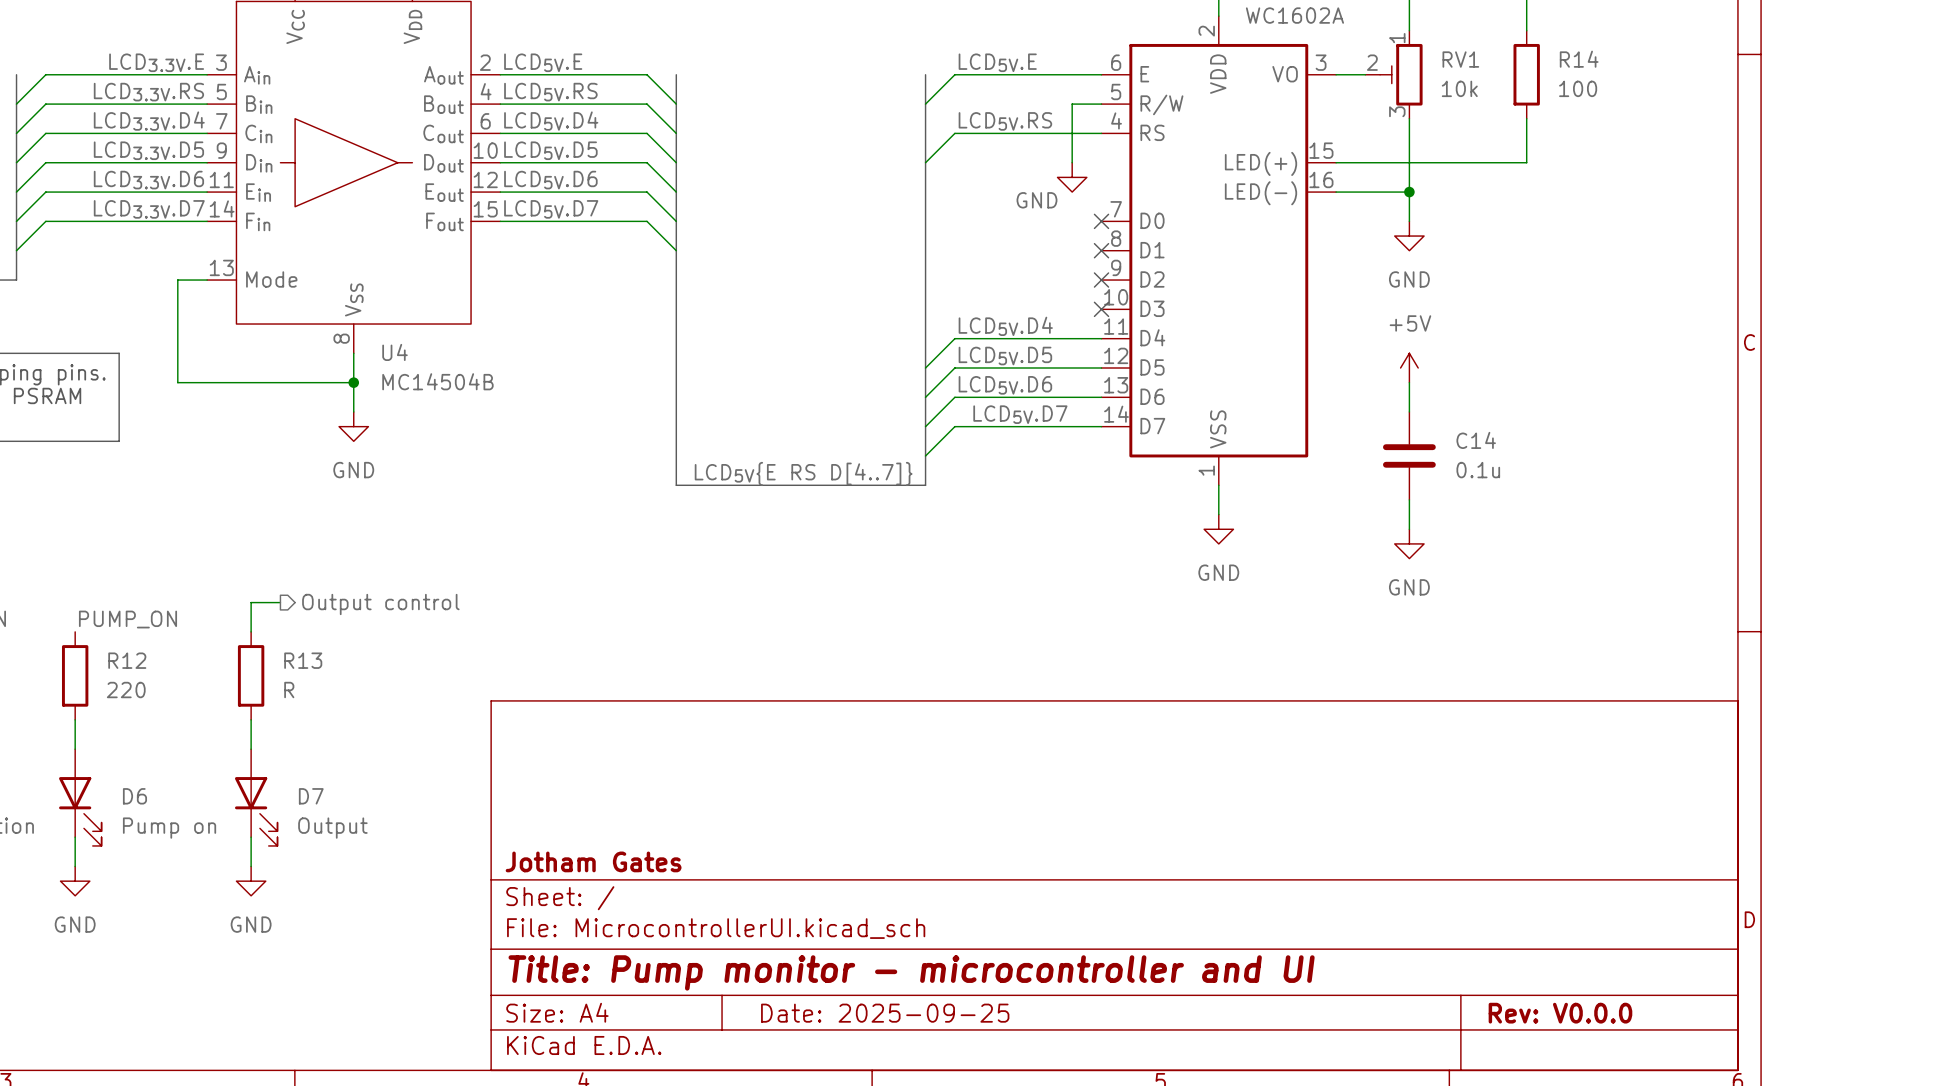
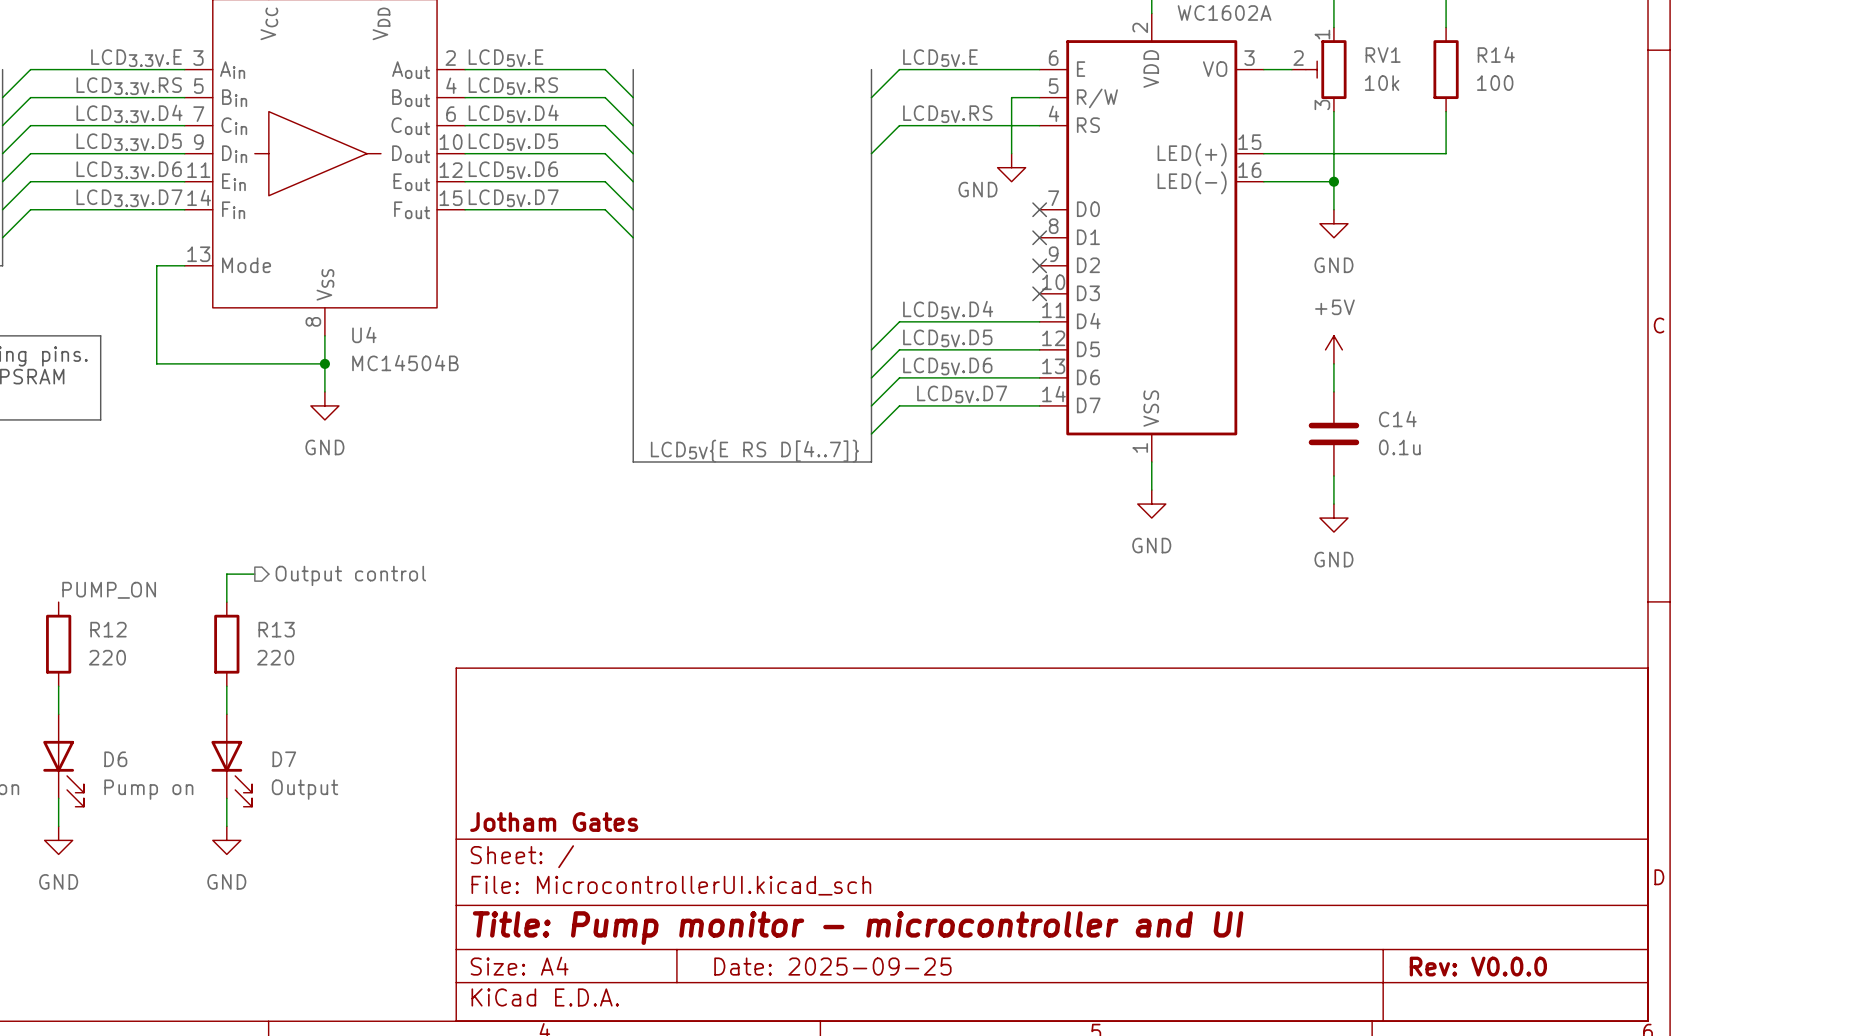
R13 value: R (289, 690) -> 220 (275, 657)

